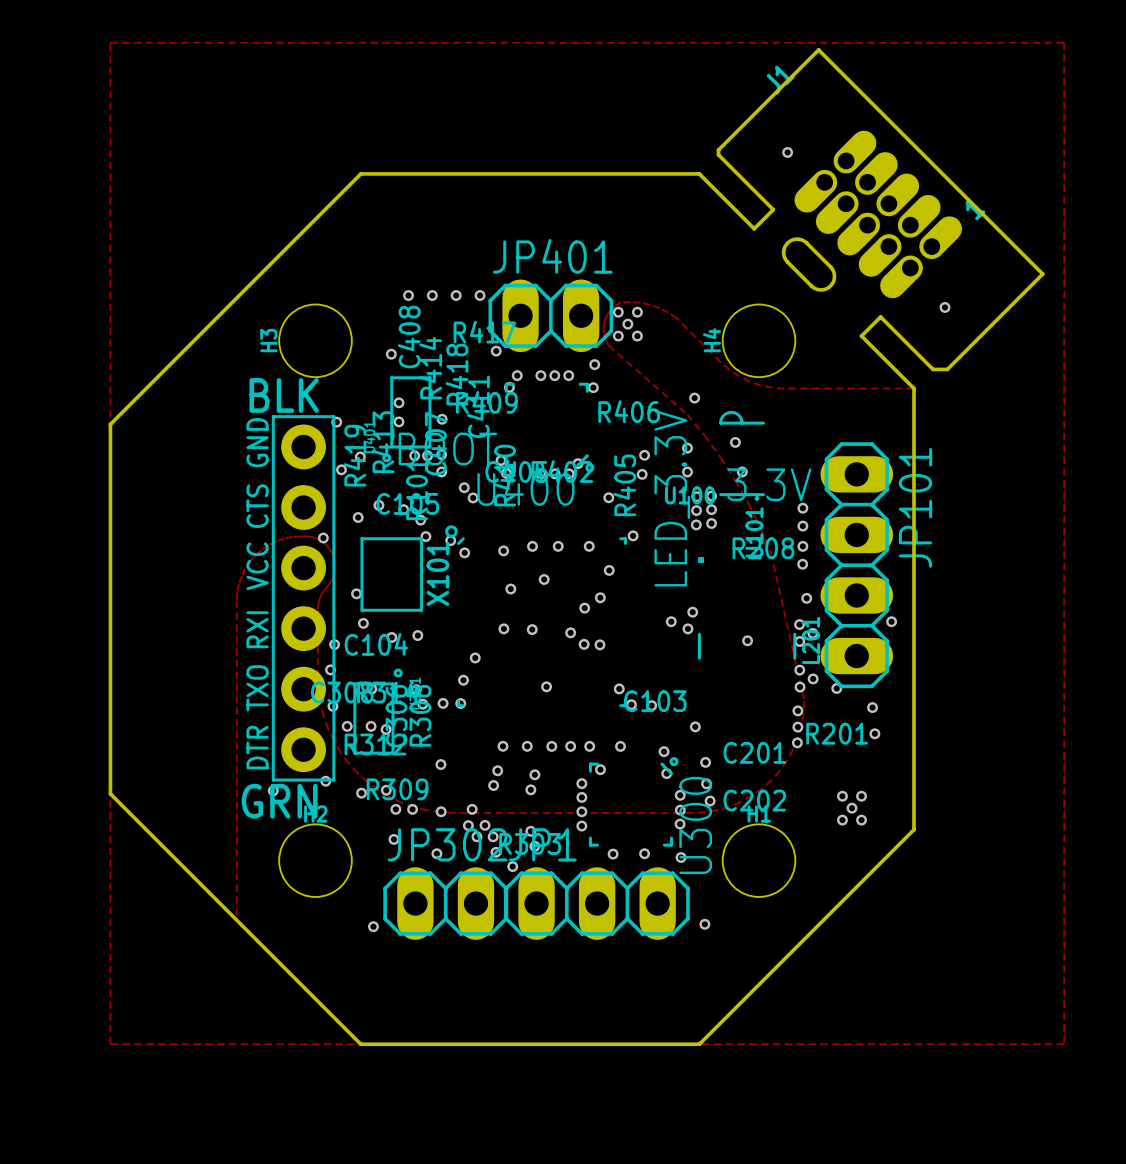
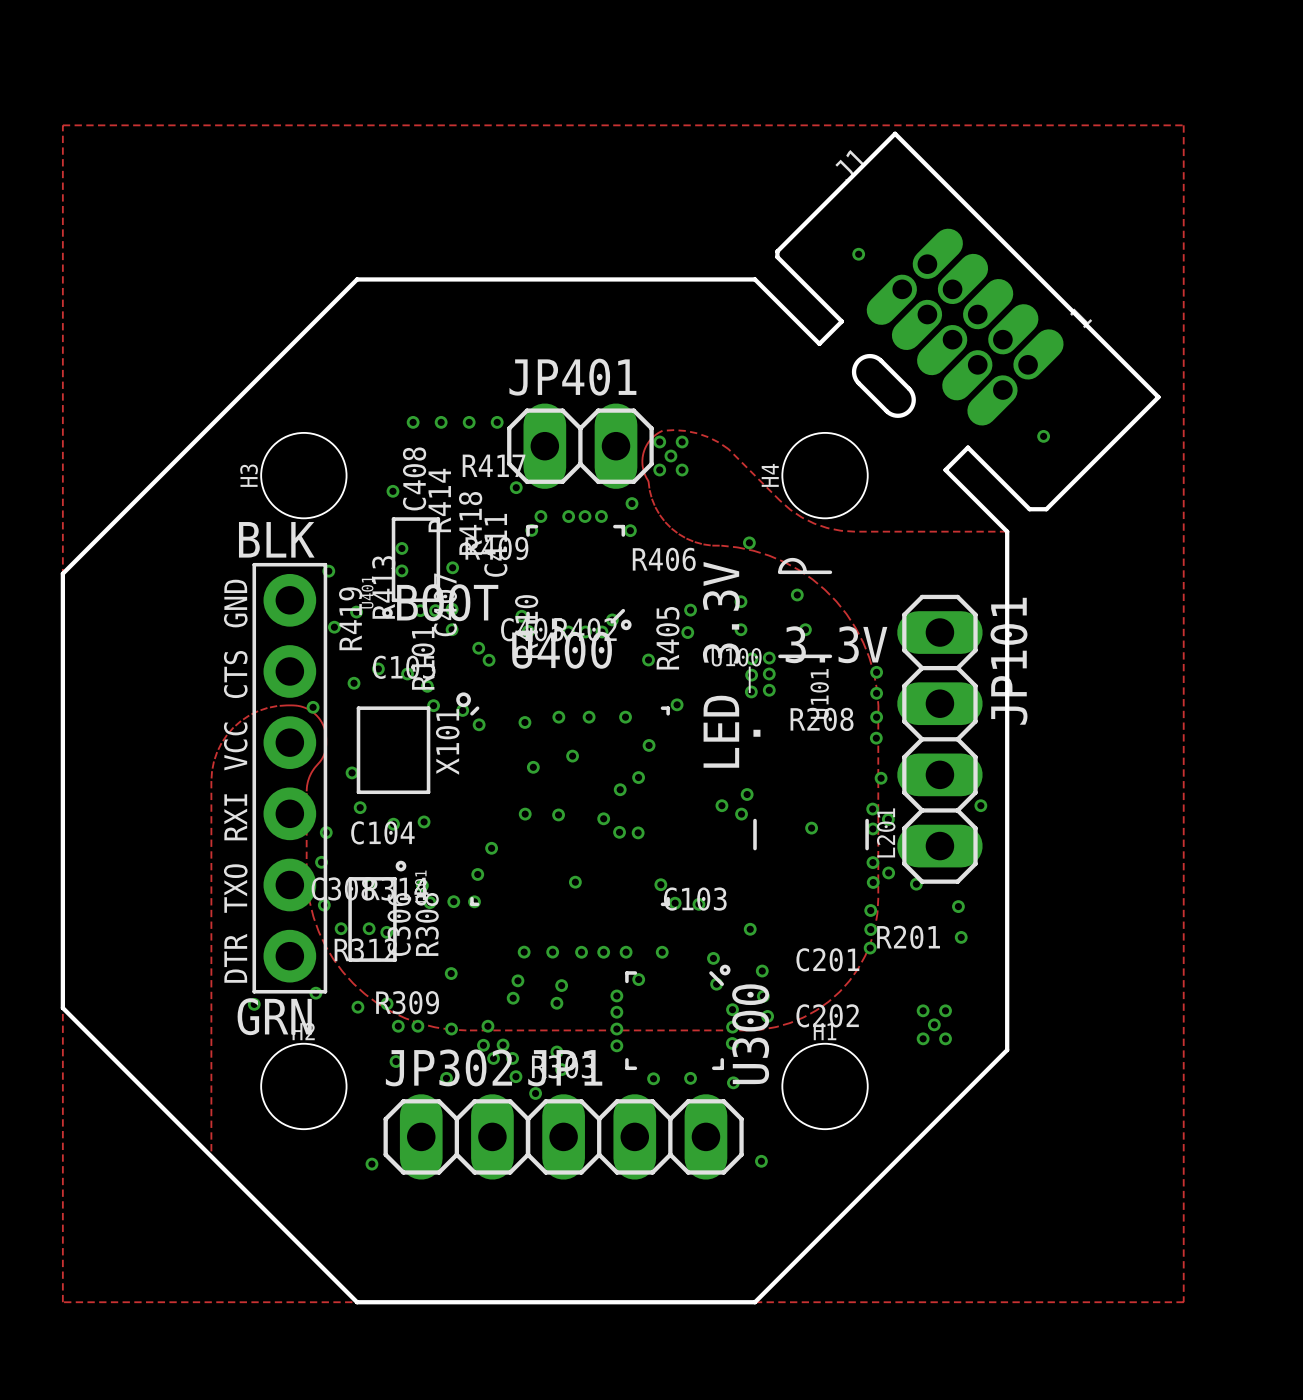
zone outline: (608, 345) (687, 414) (720, 457) (748, 503) (770, 553) (804, 700) -> (648, 481) (651, 498) (659, 514) (678, 534) (703, 544) (753, 550) (784, 562) (798, 569) (824, 589) (836, 601) (855, 627) (869, 657) (876, 689) (878, 705) (878, 898)

